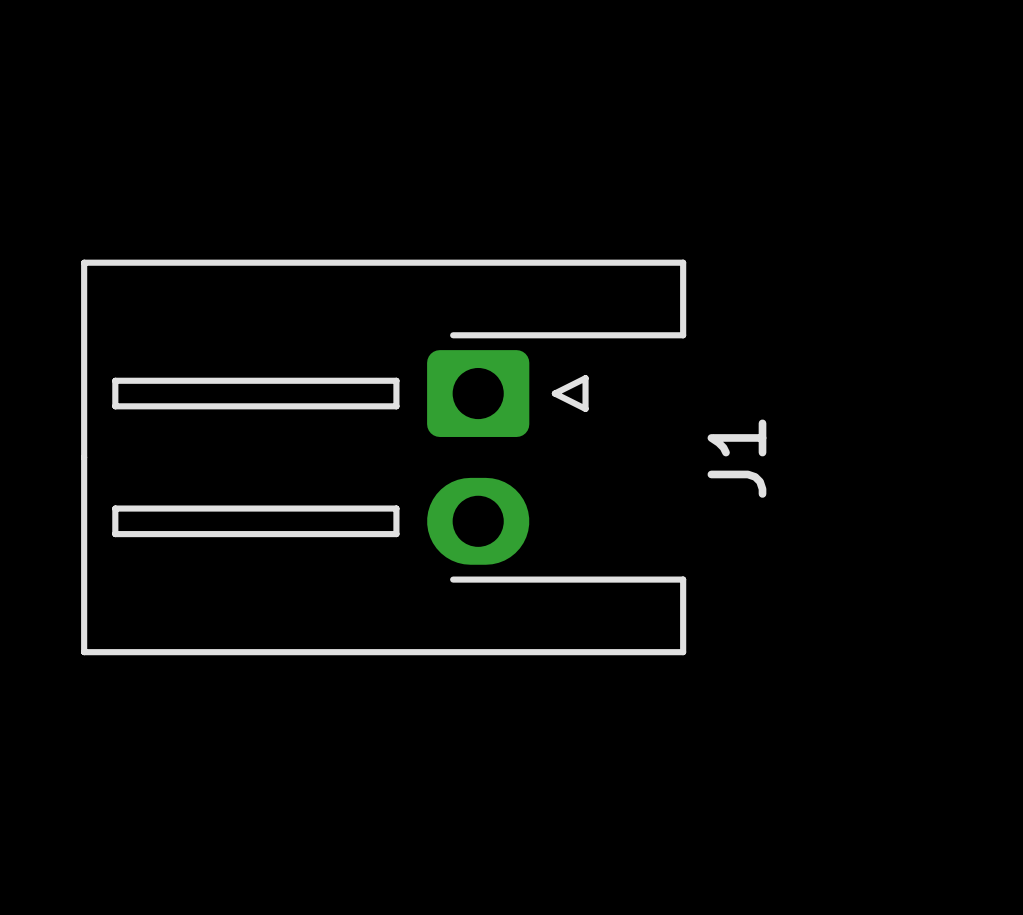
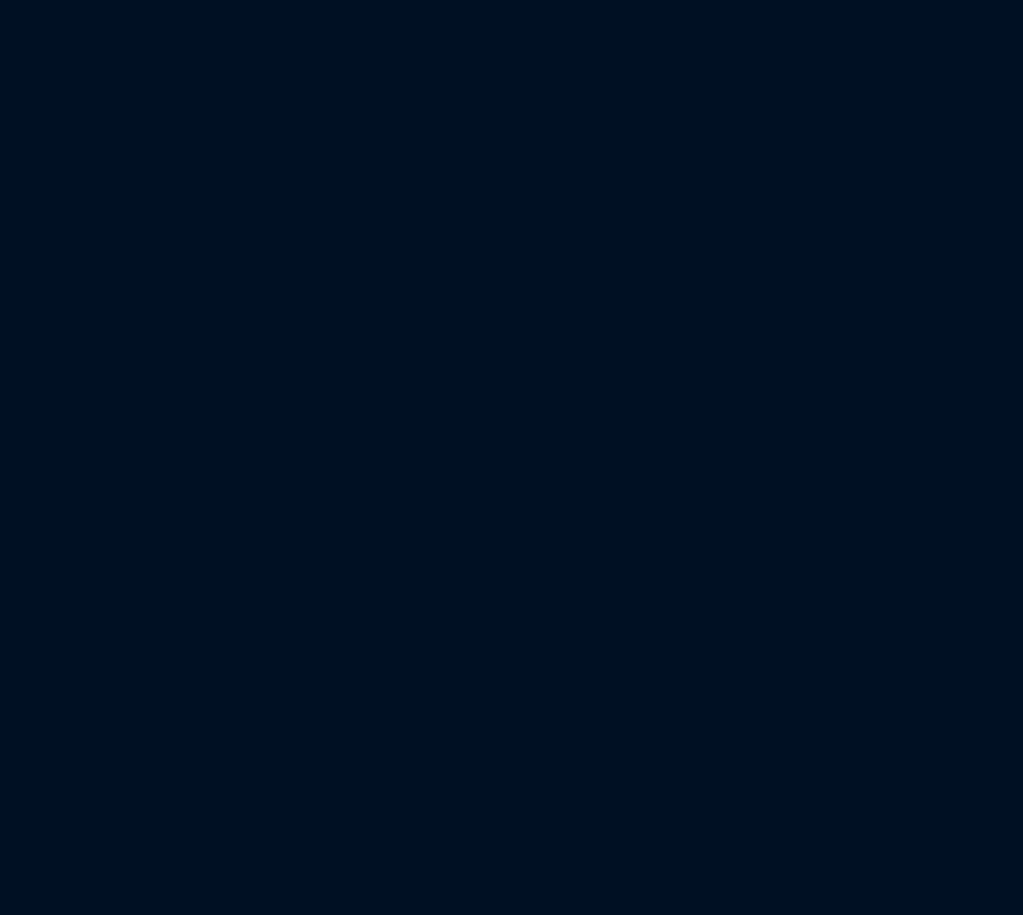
J1: (383, 457) -> none

